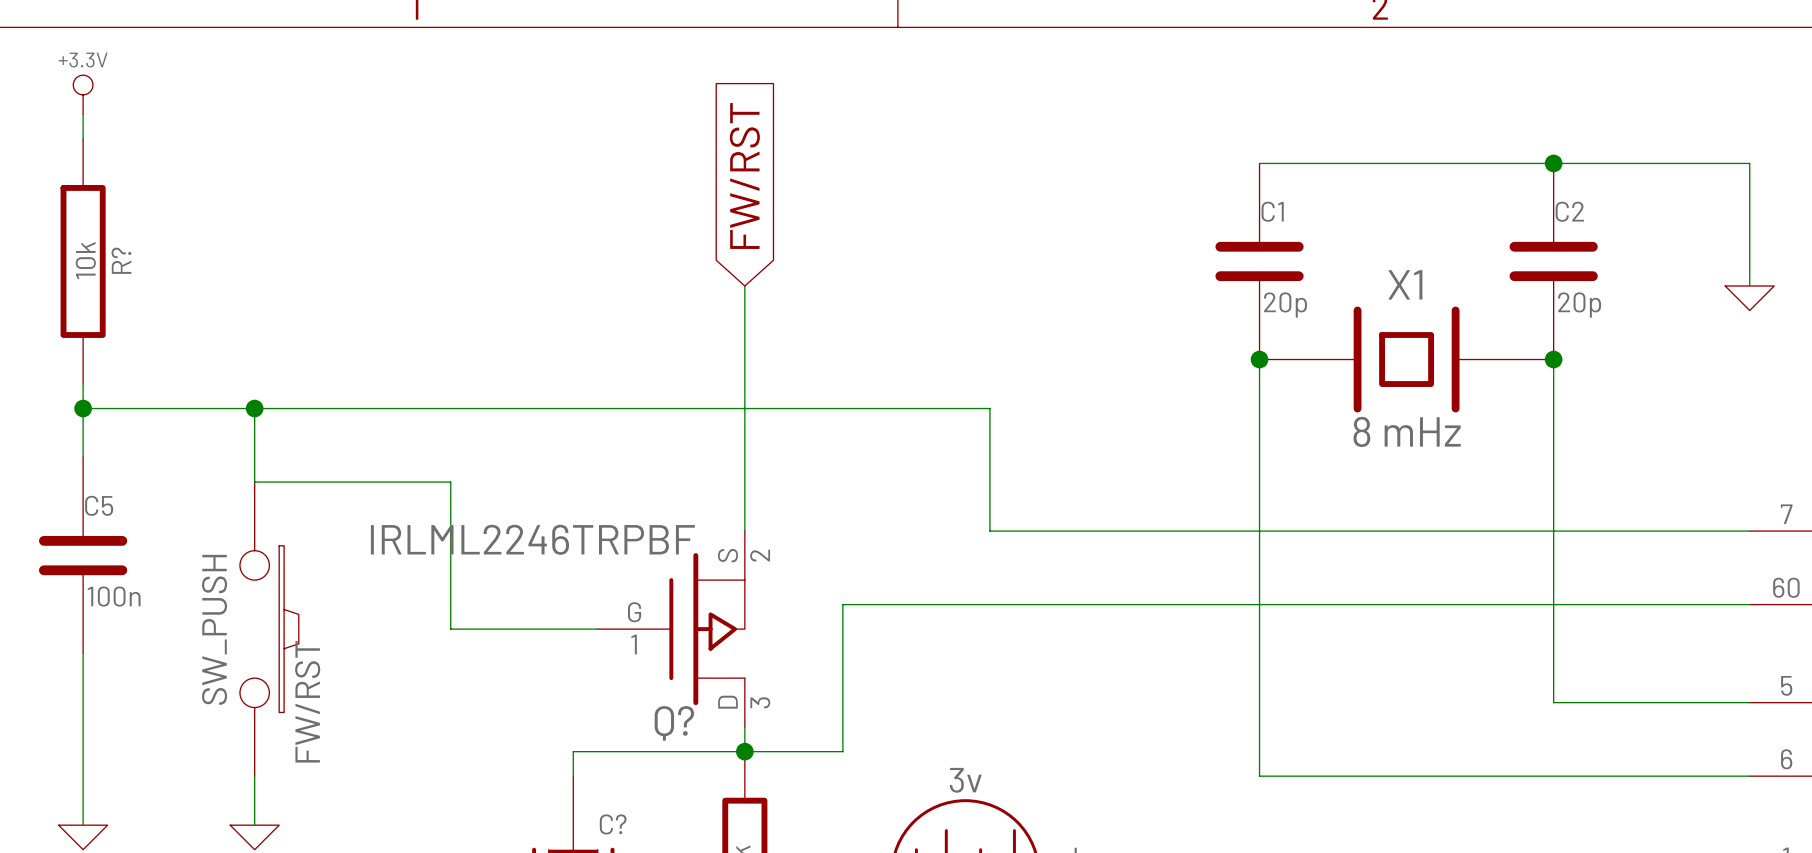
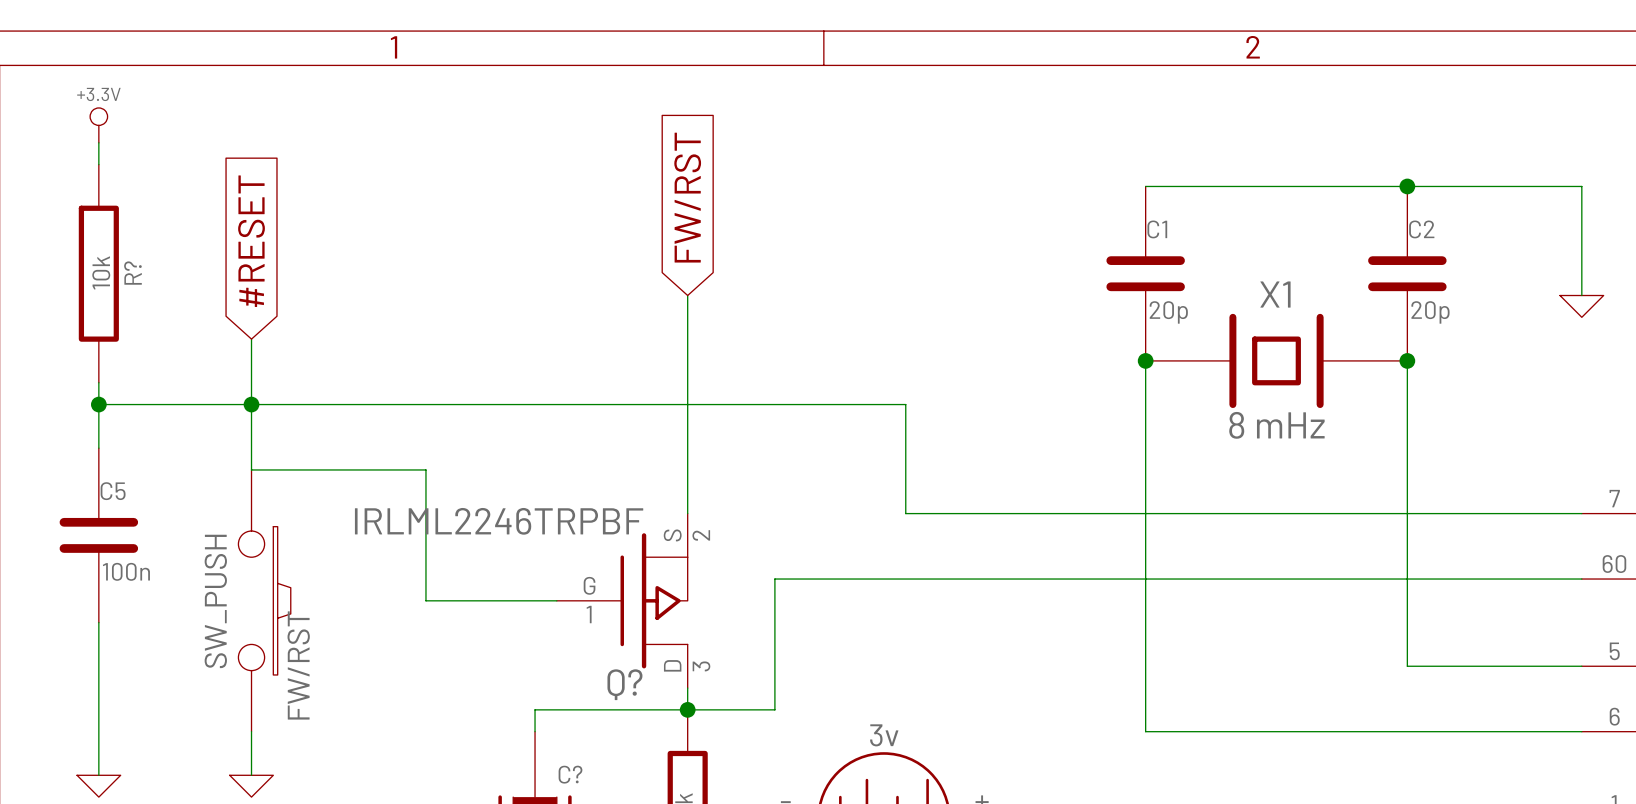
global label: none -> #RESET (251, 241)
wire: none -> (251, 339) (251, 404)

